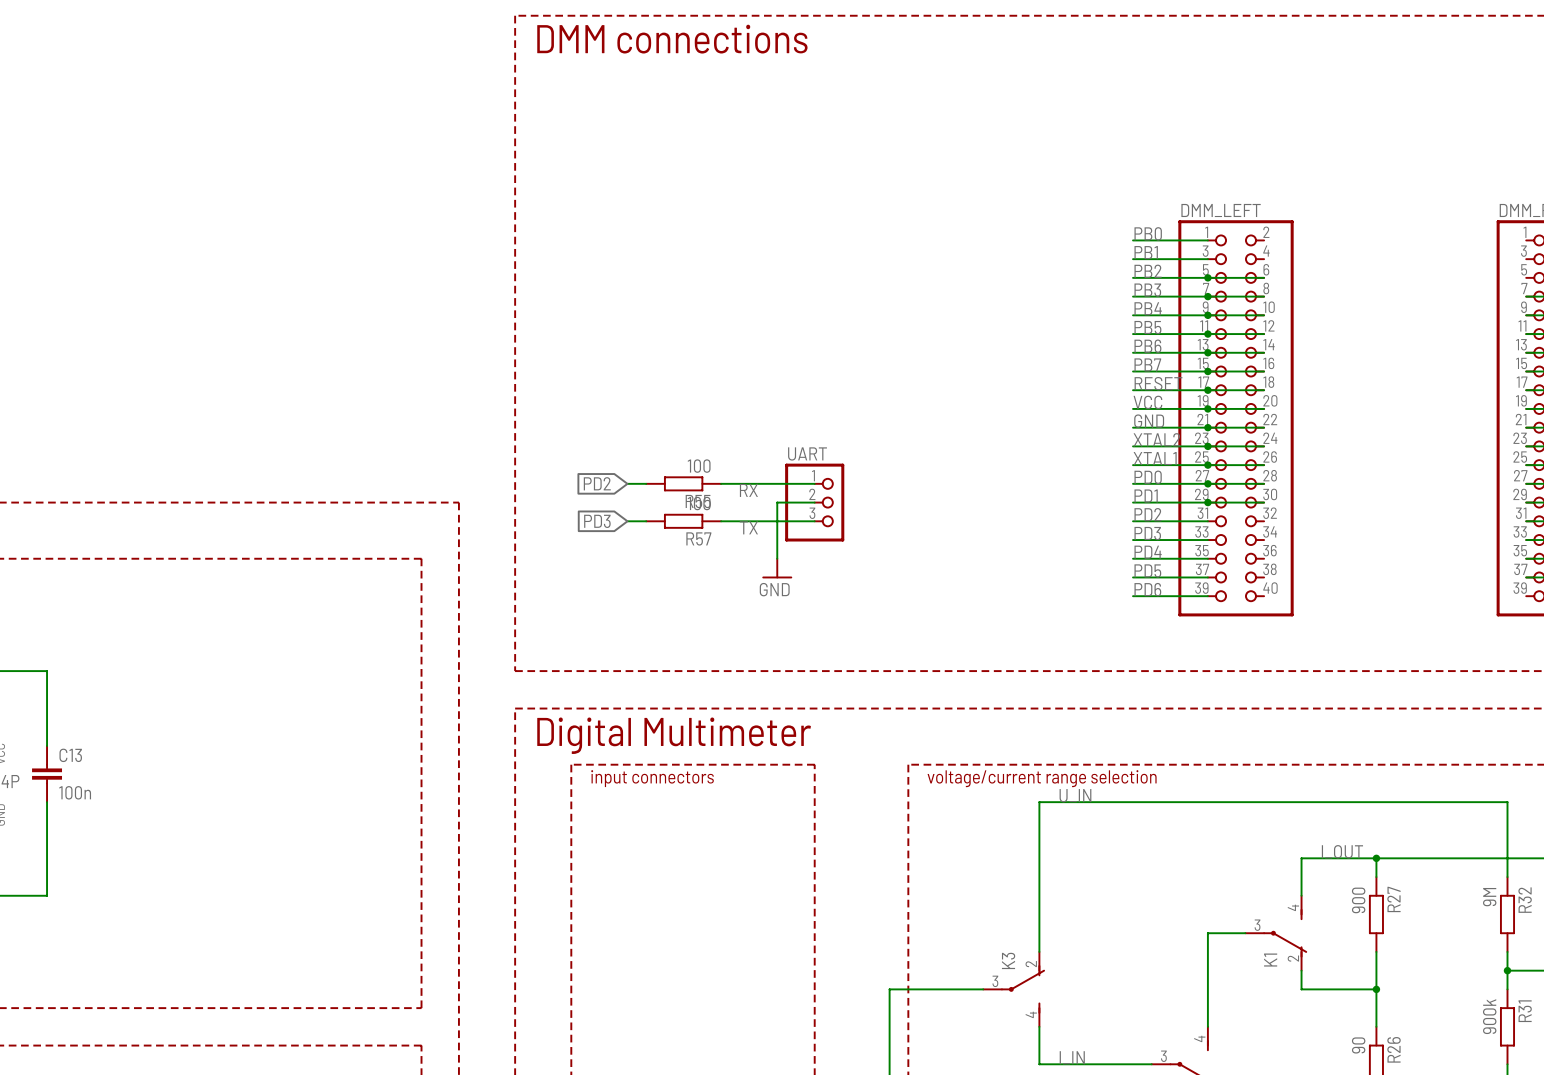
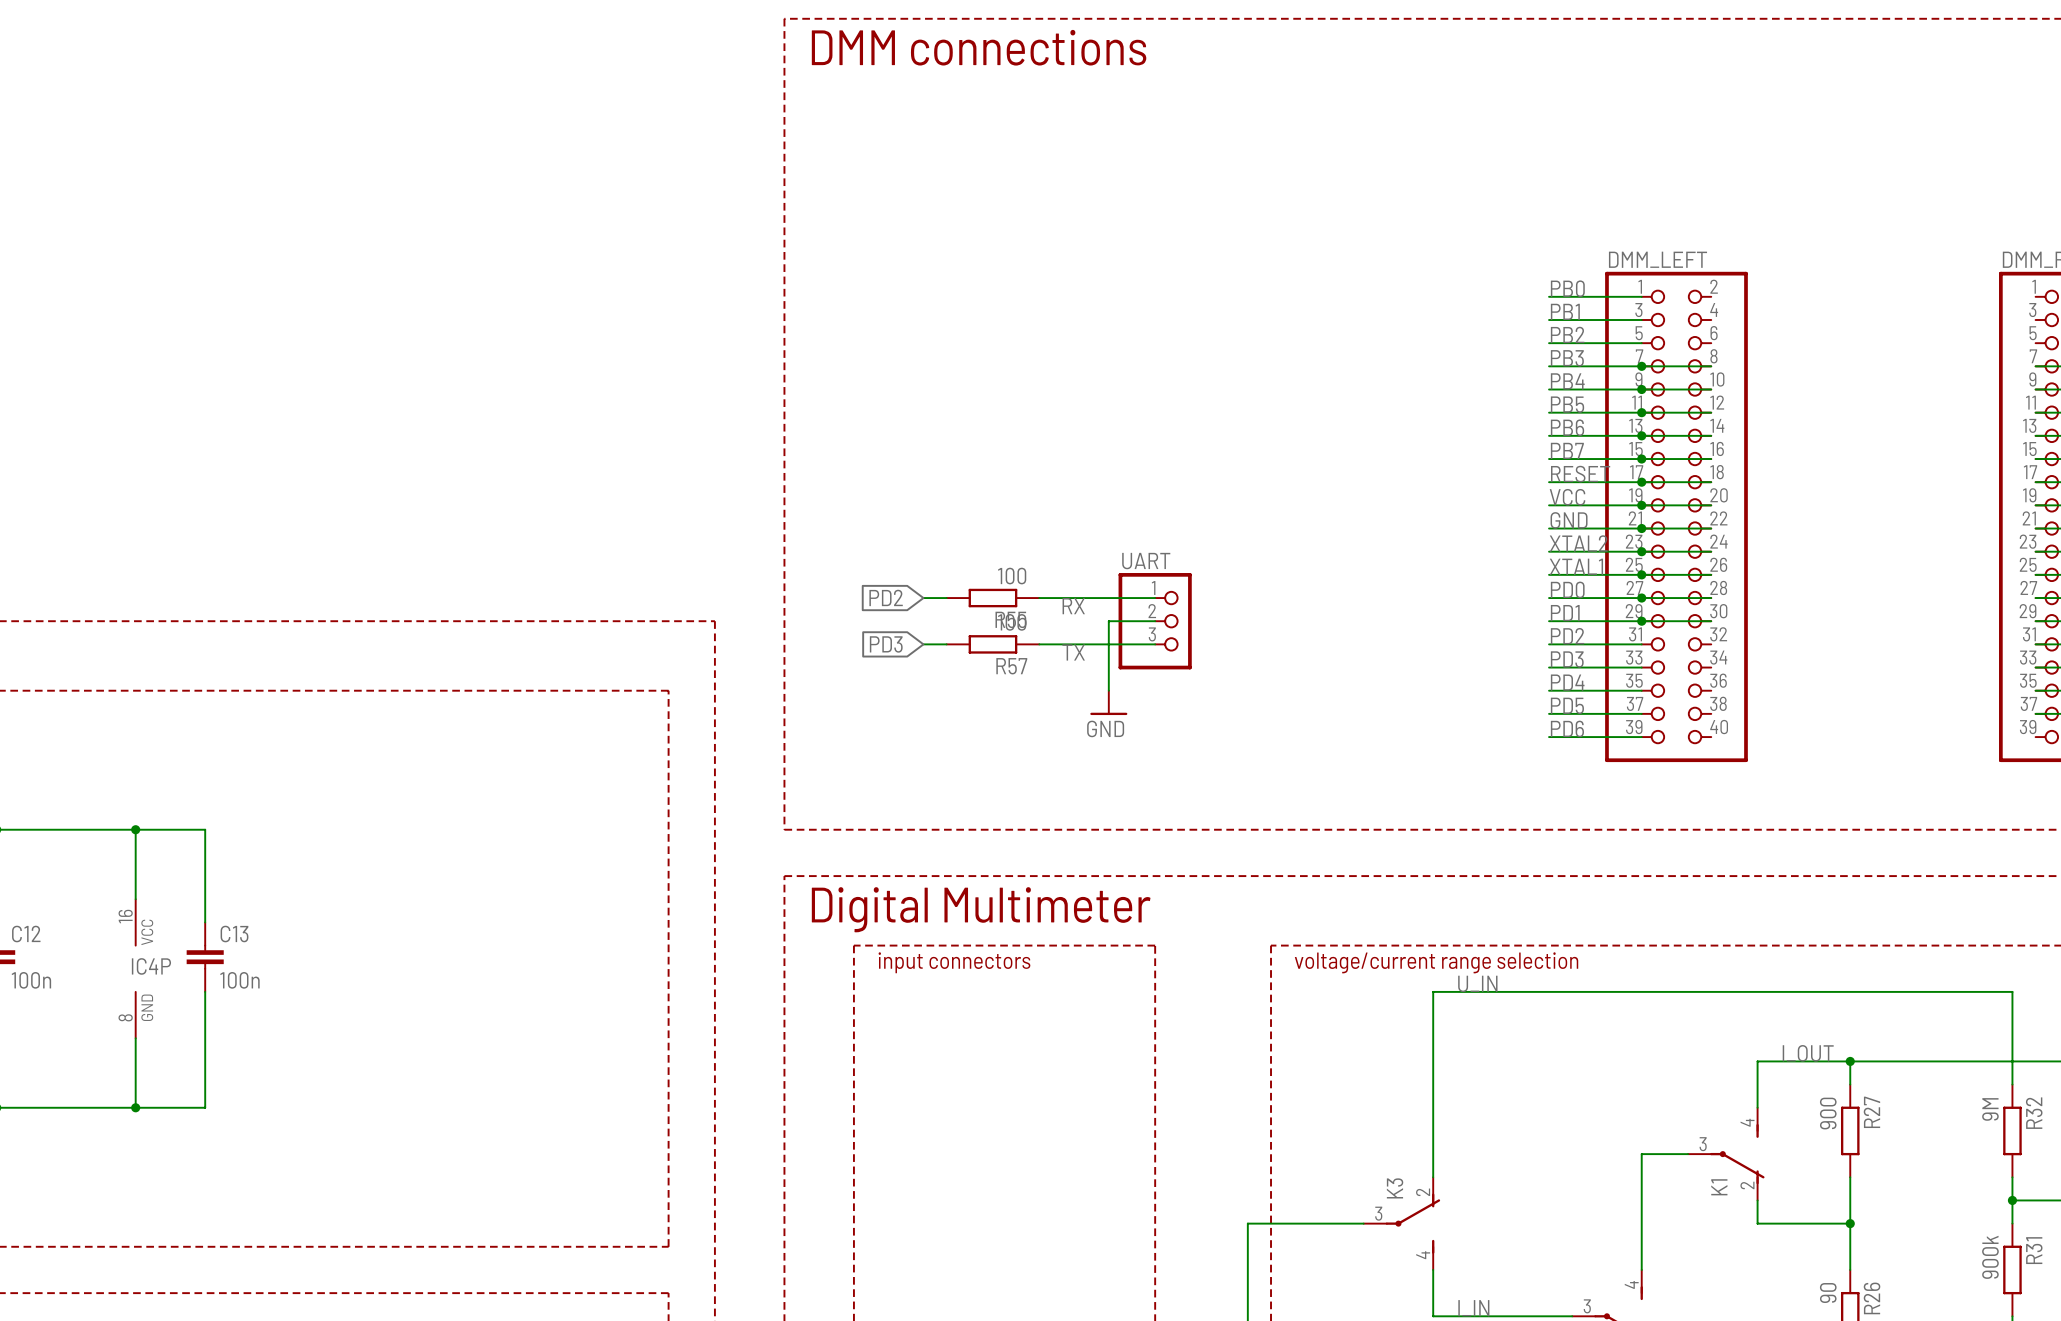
wire: (1207, 277) (1264, 277) -> none
junction: (1207, 277) -> none

